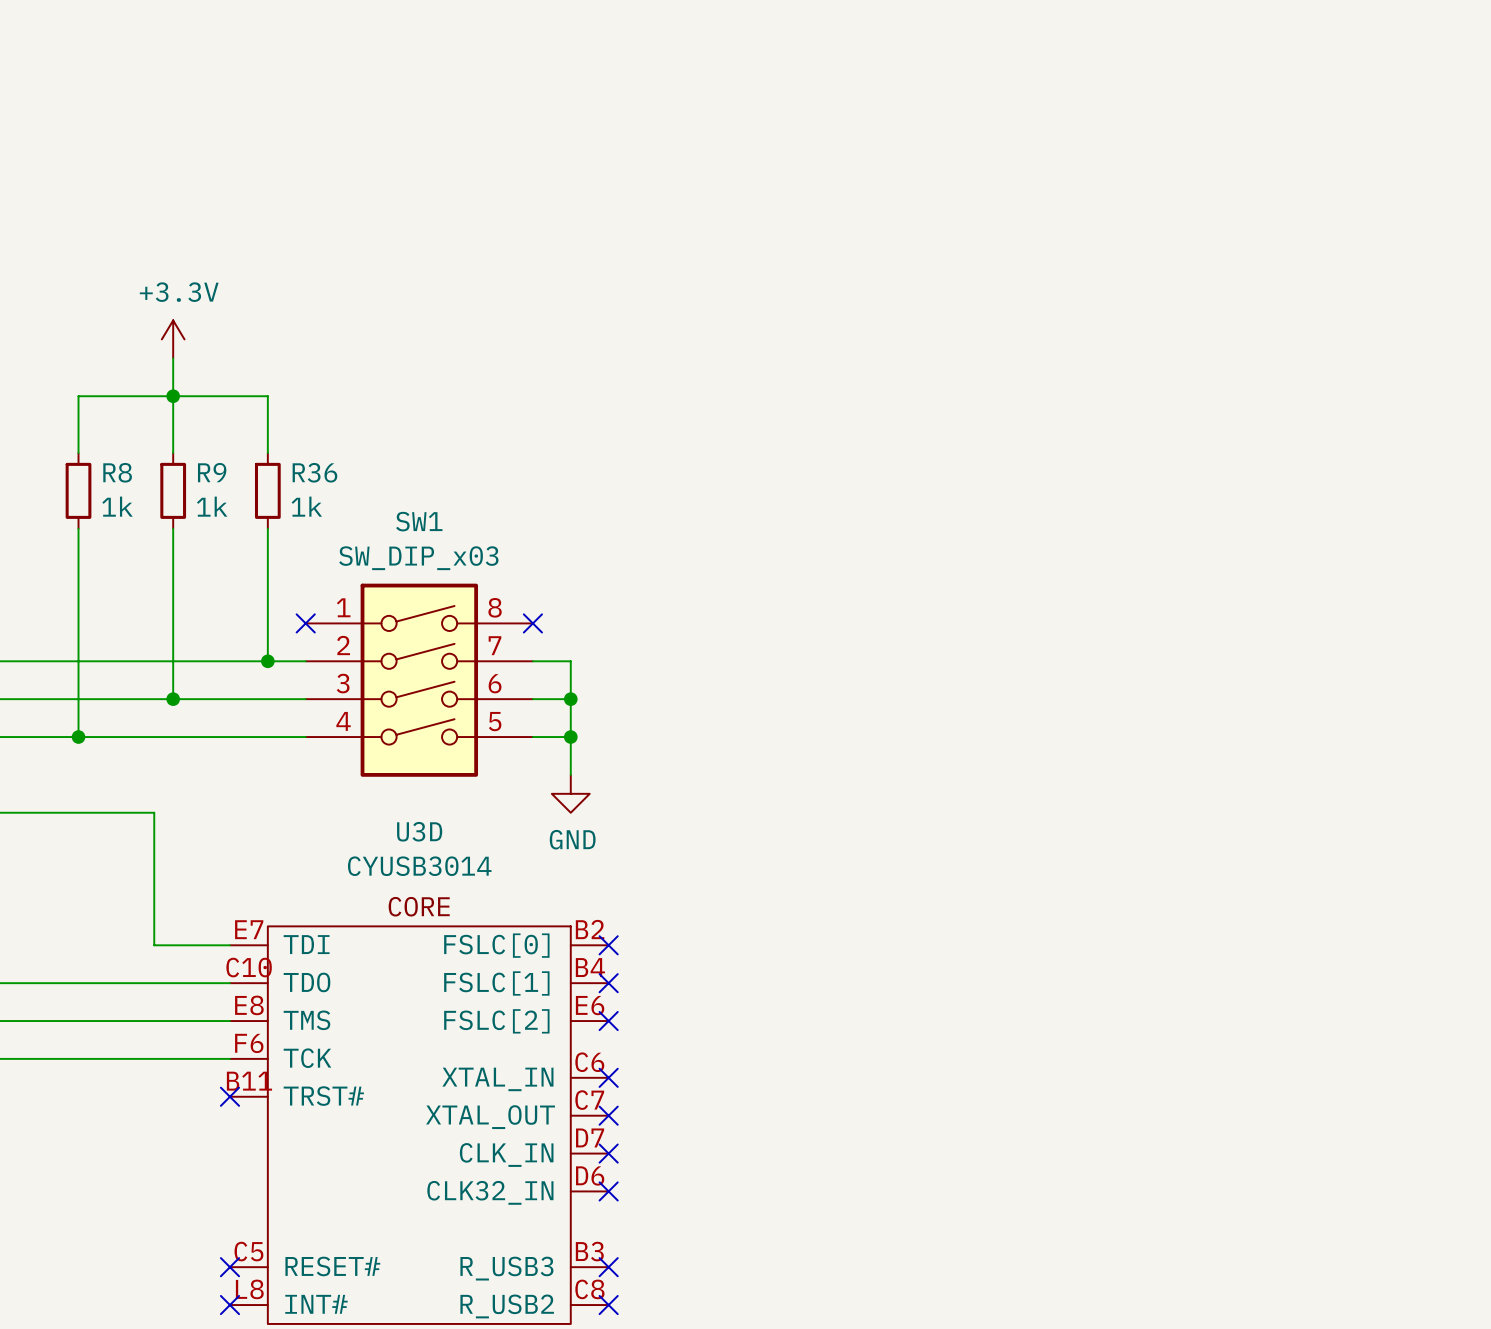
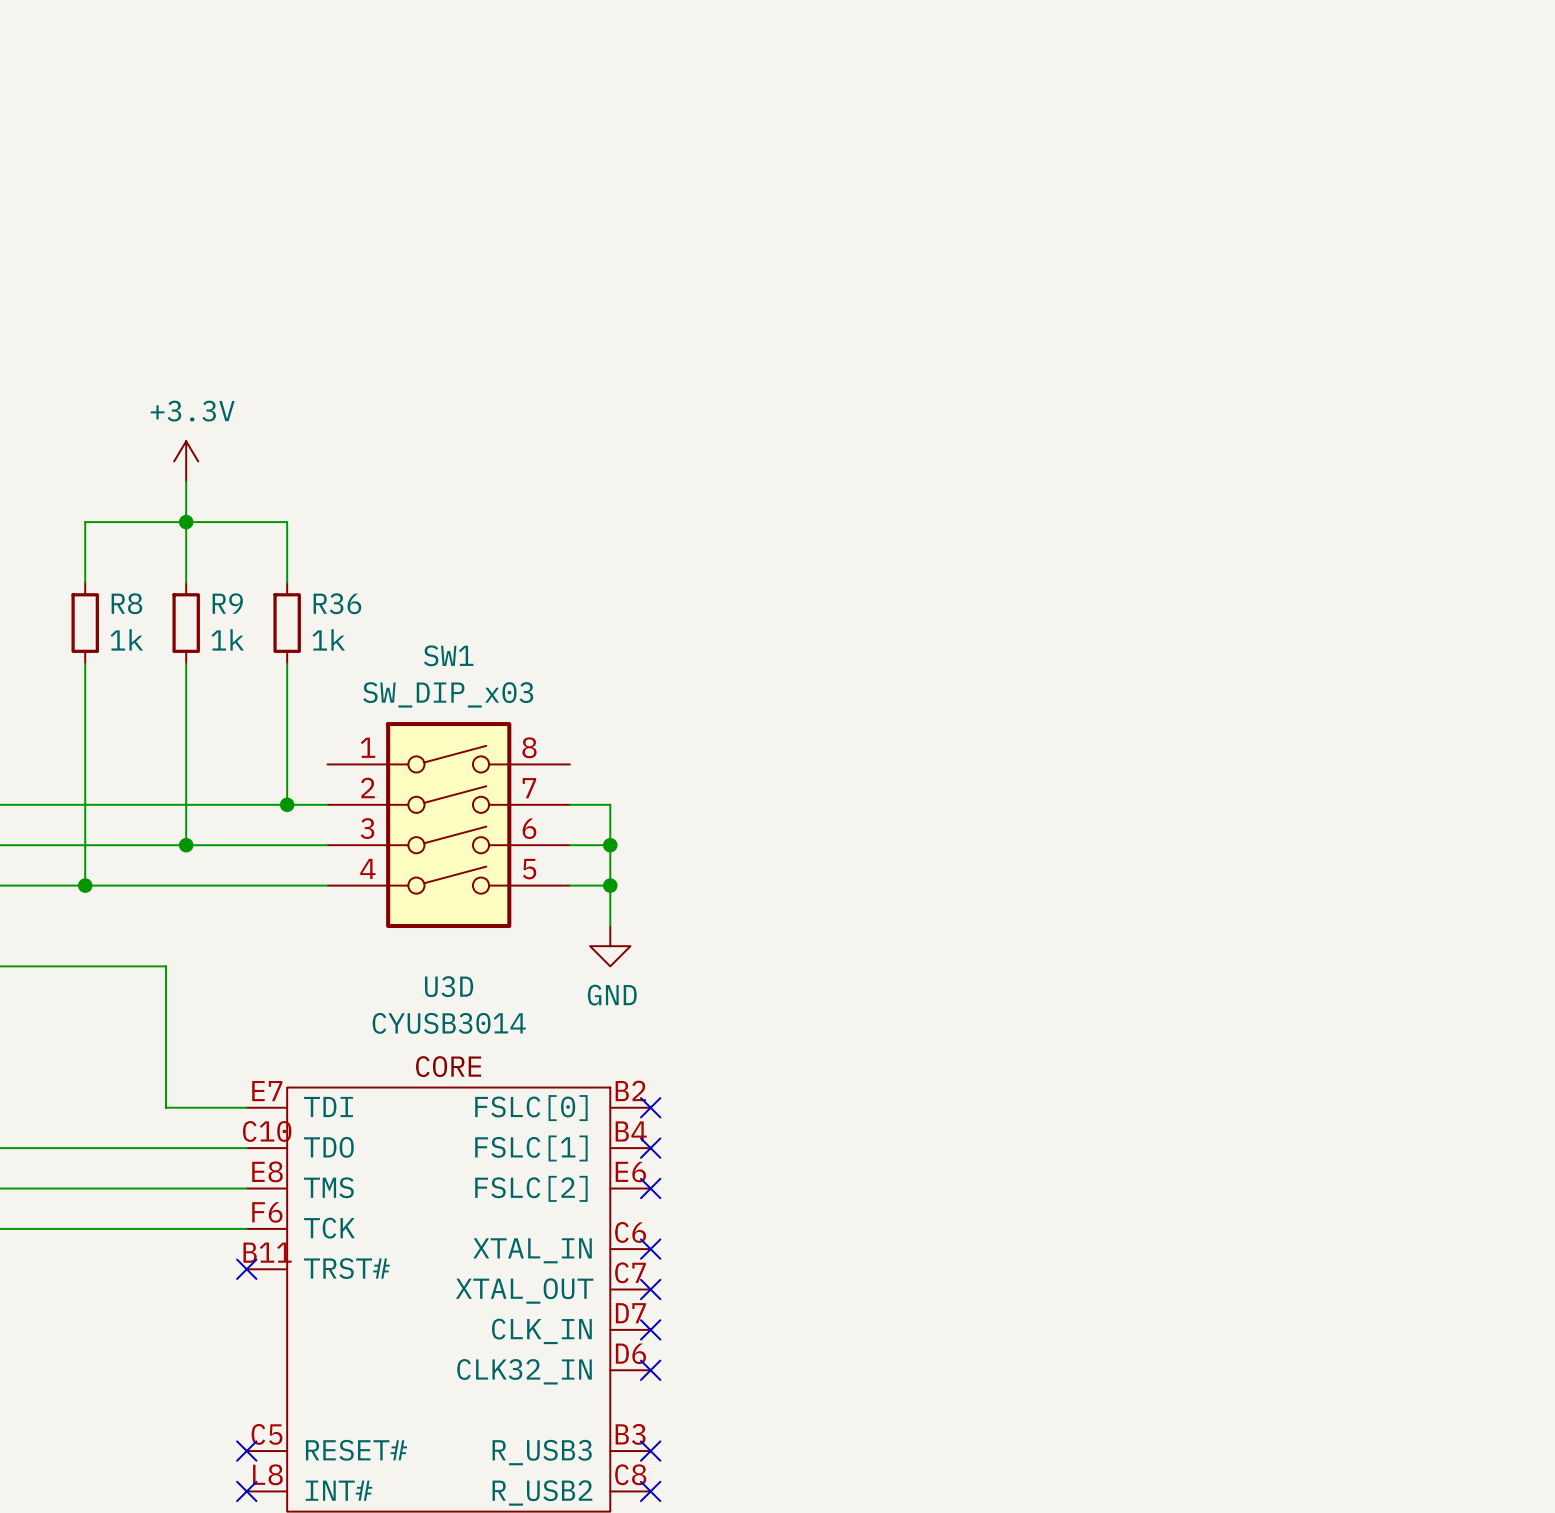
no-connect mark: (305, 623) -> none
no-connect mark: (532, 623) -> none

